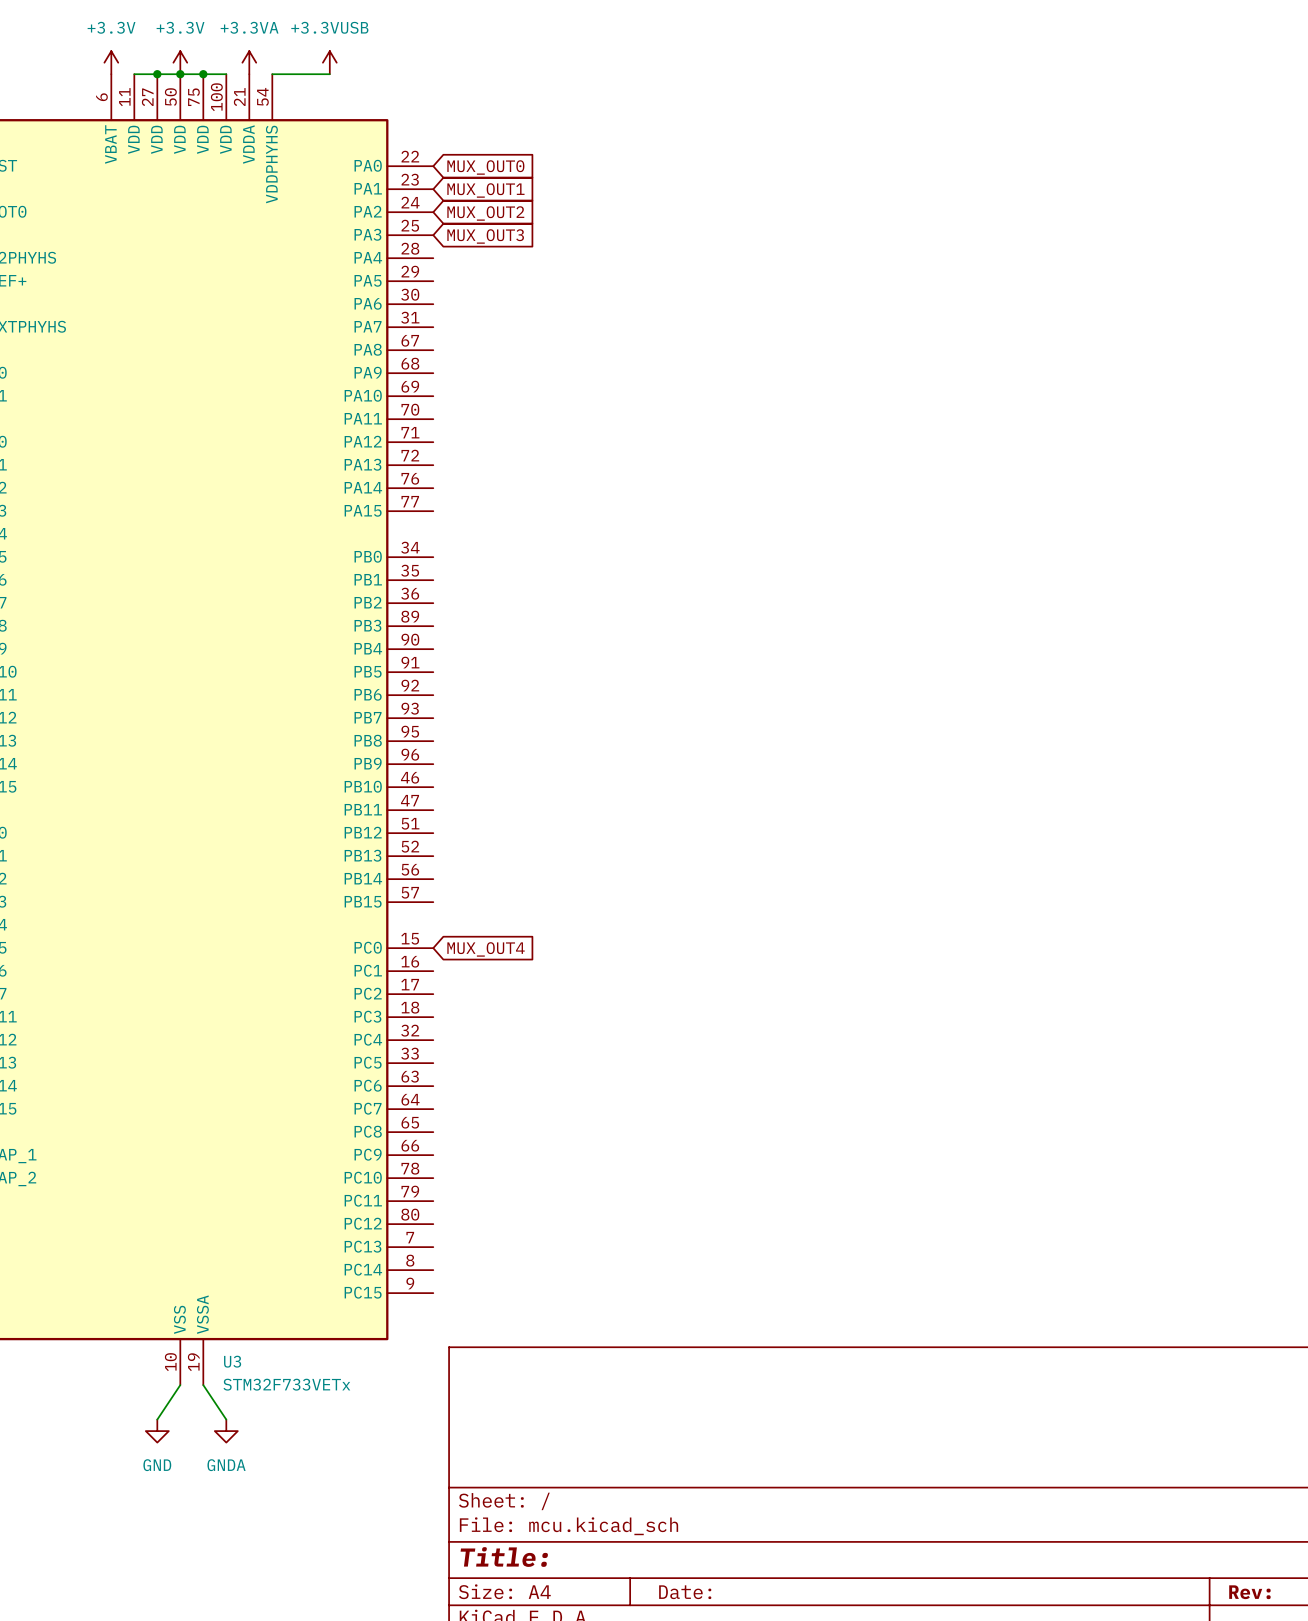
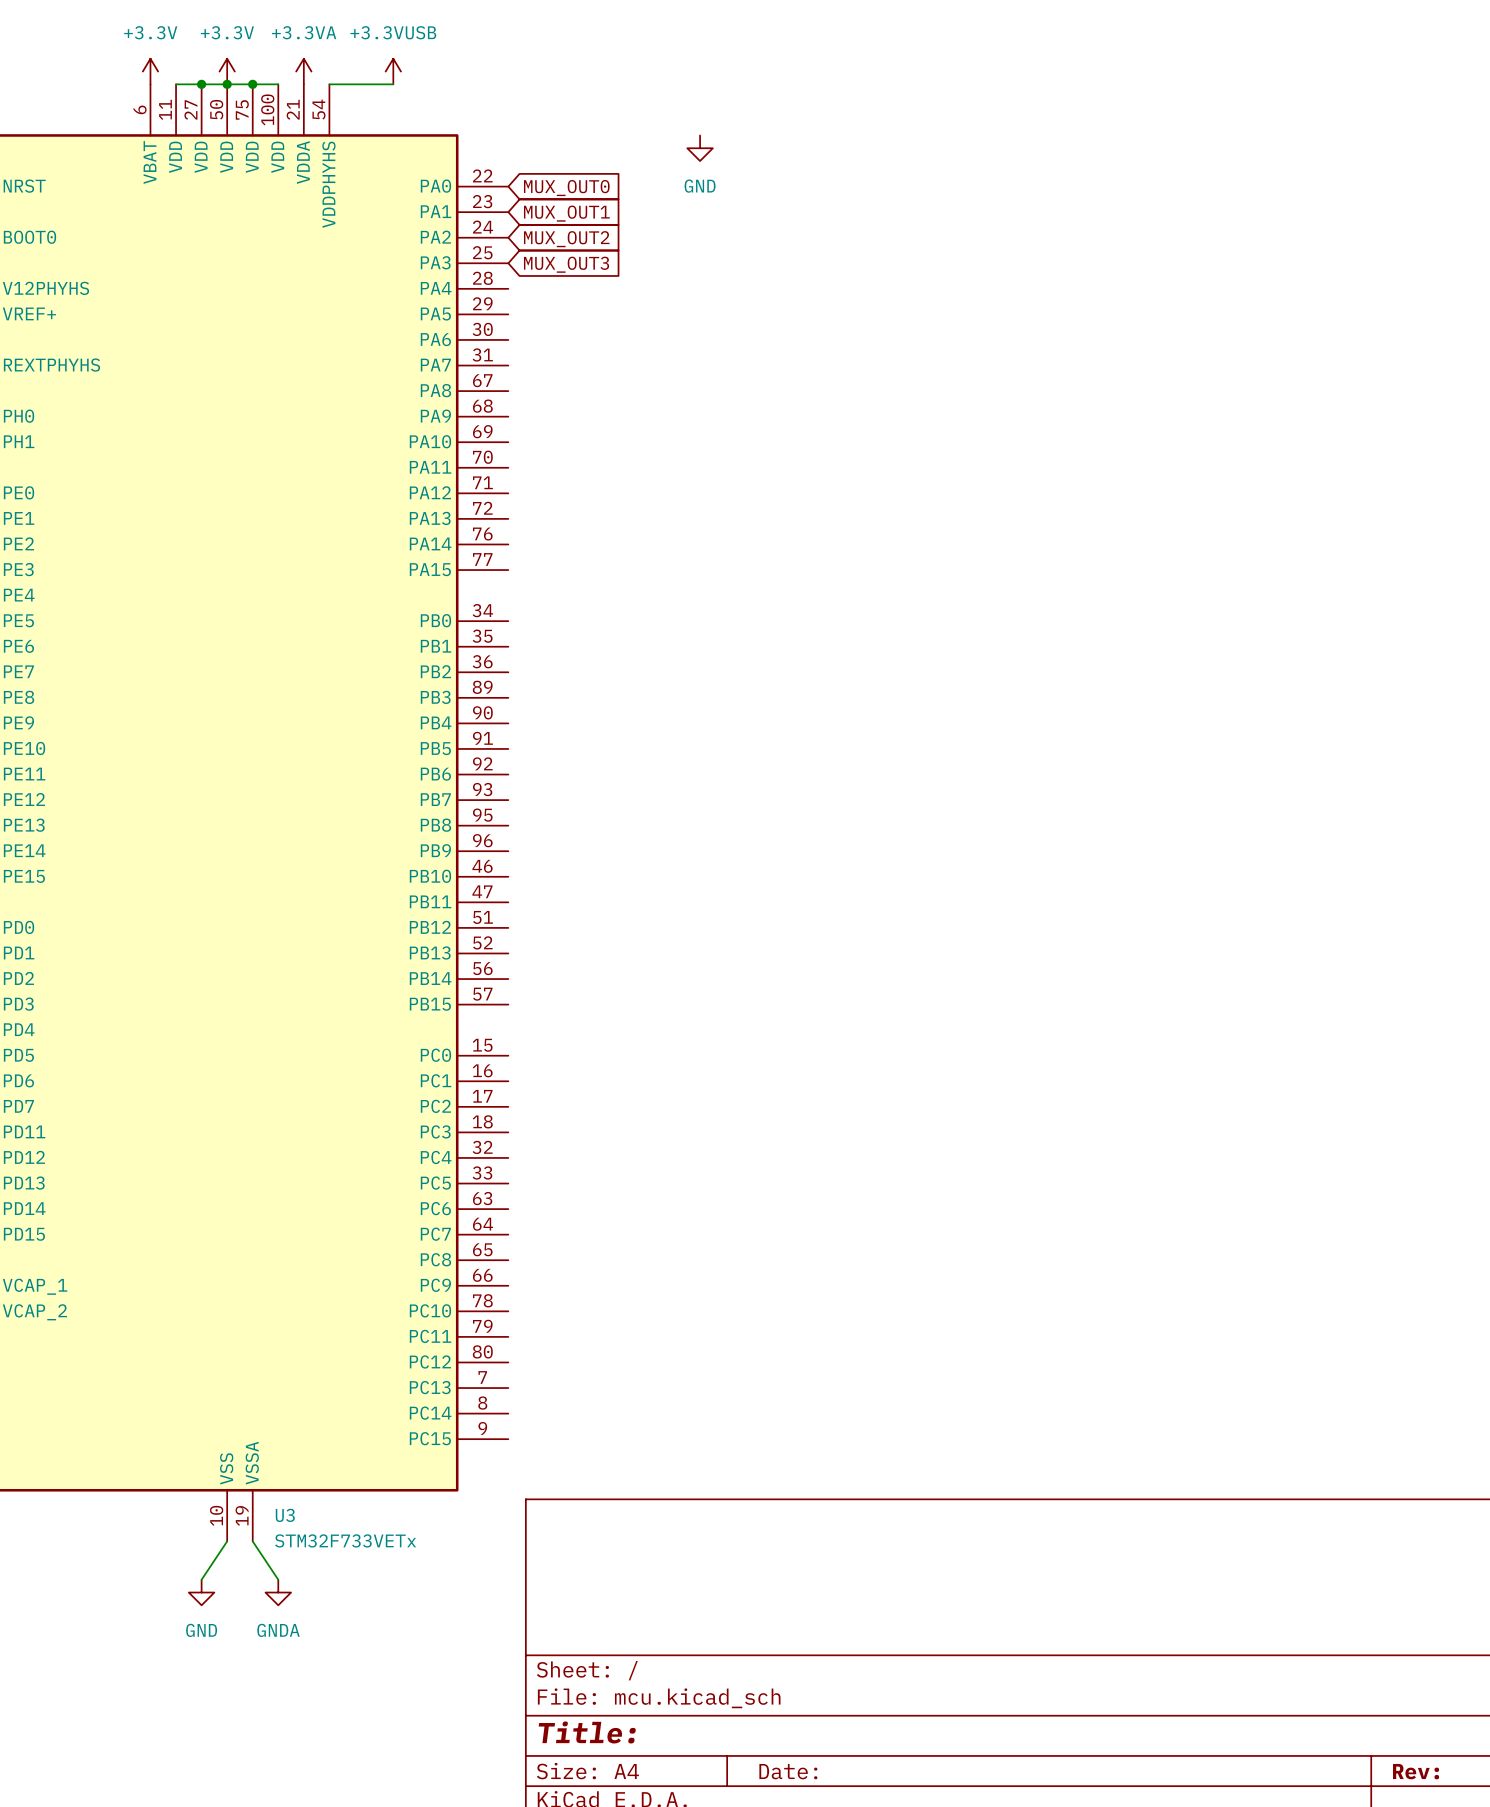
power symbol: none -> GND (700, 148)
global label: MUX_OUT4 (486, 949) -> none

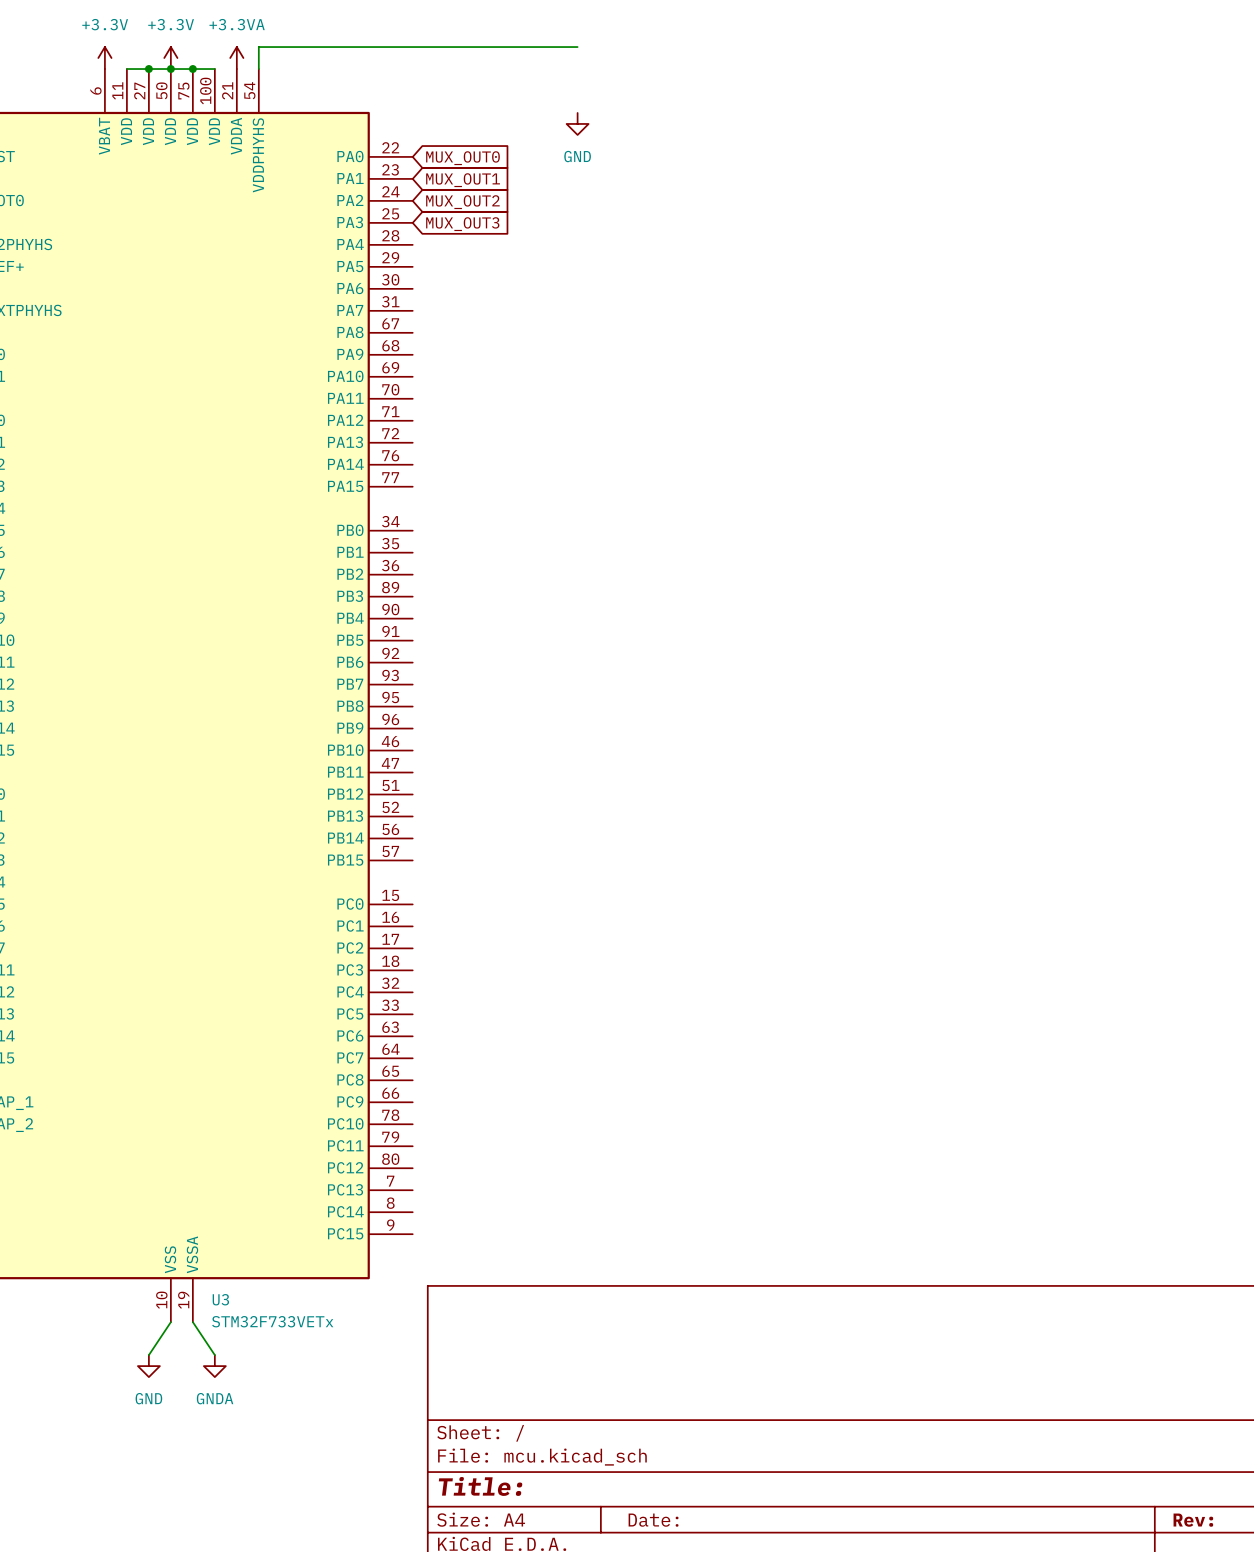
power symbol: +3.3VUSB (393, 71) -> none
wire: (329, 84) (393, 84) -> (258, 69) (258, 47) (577, 47)

